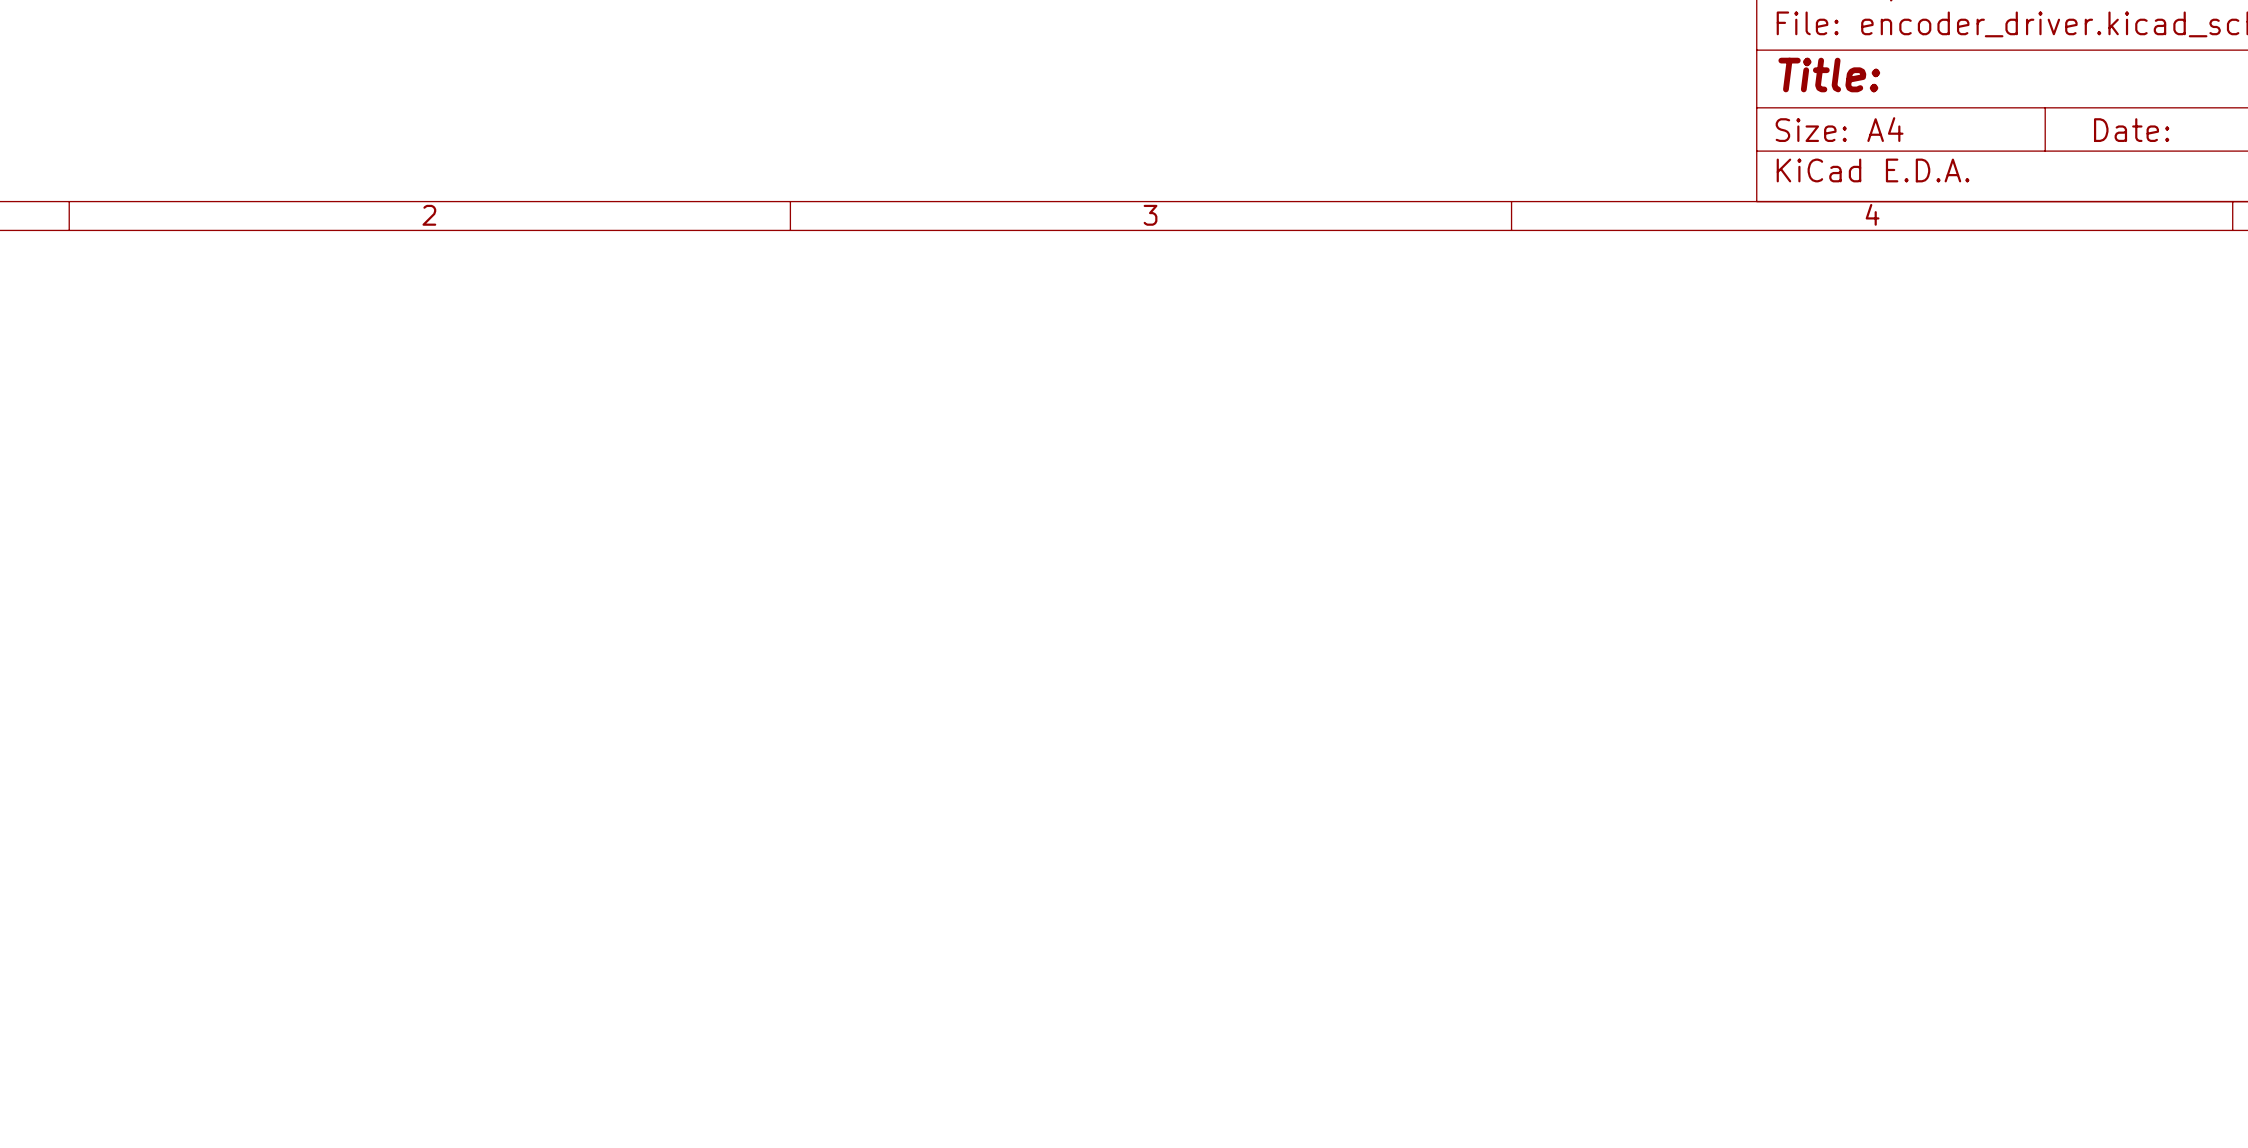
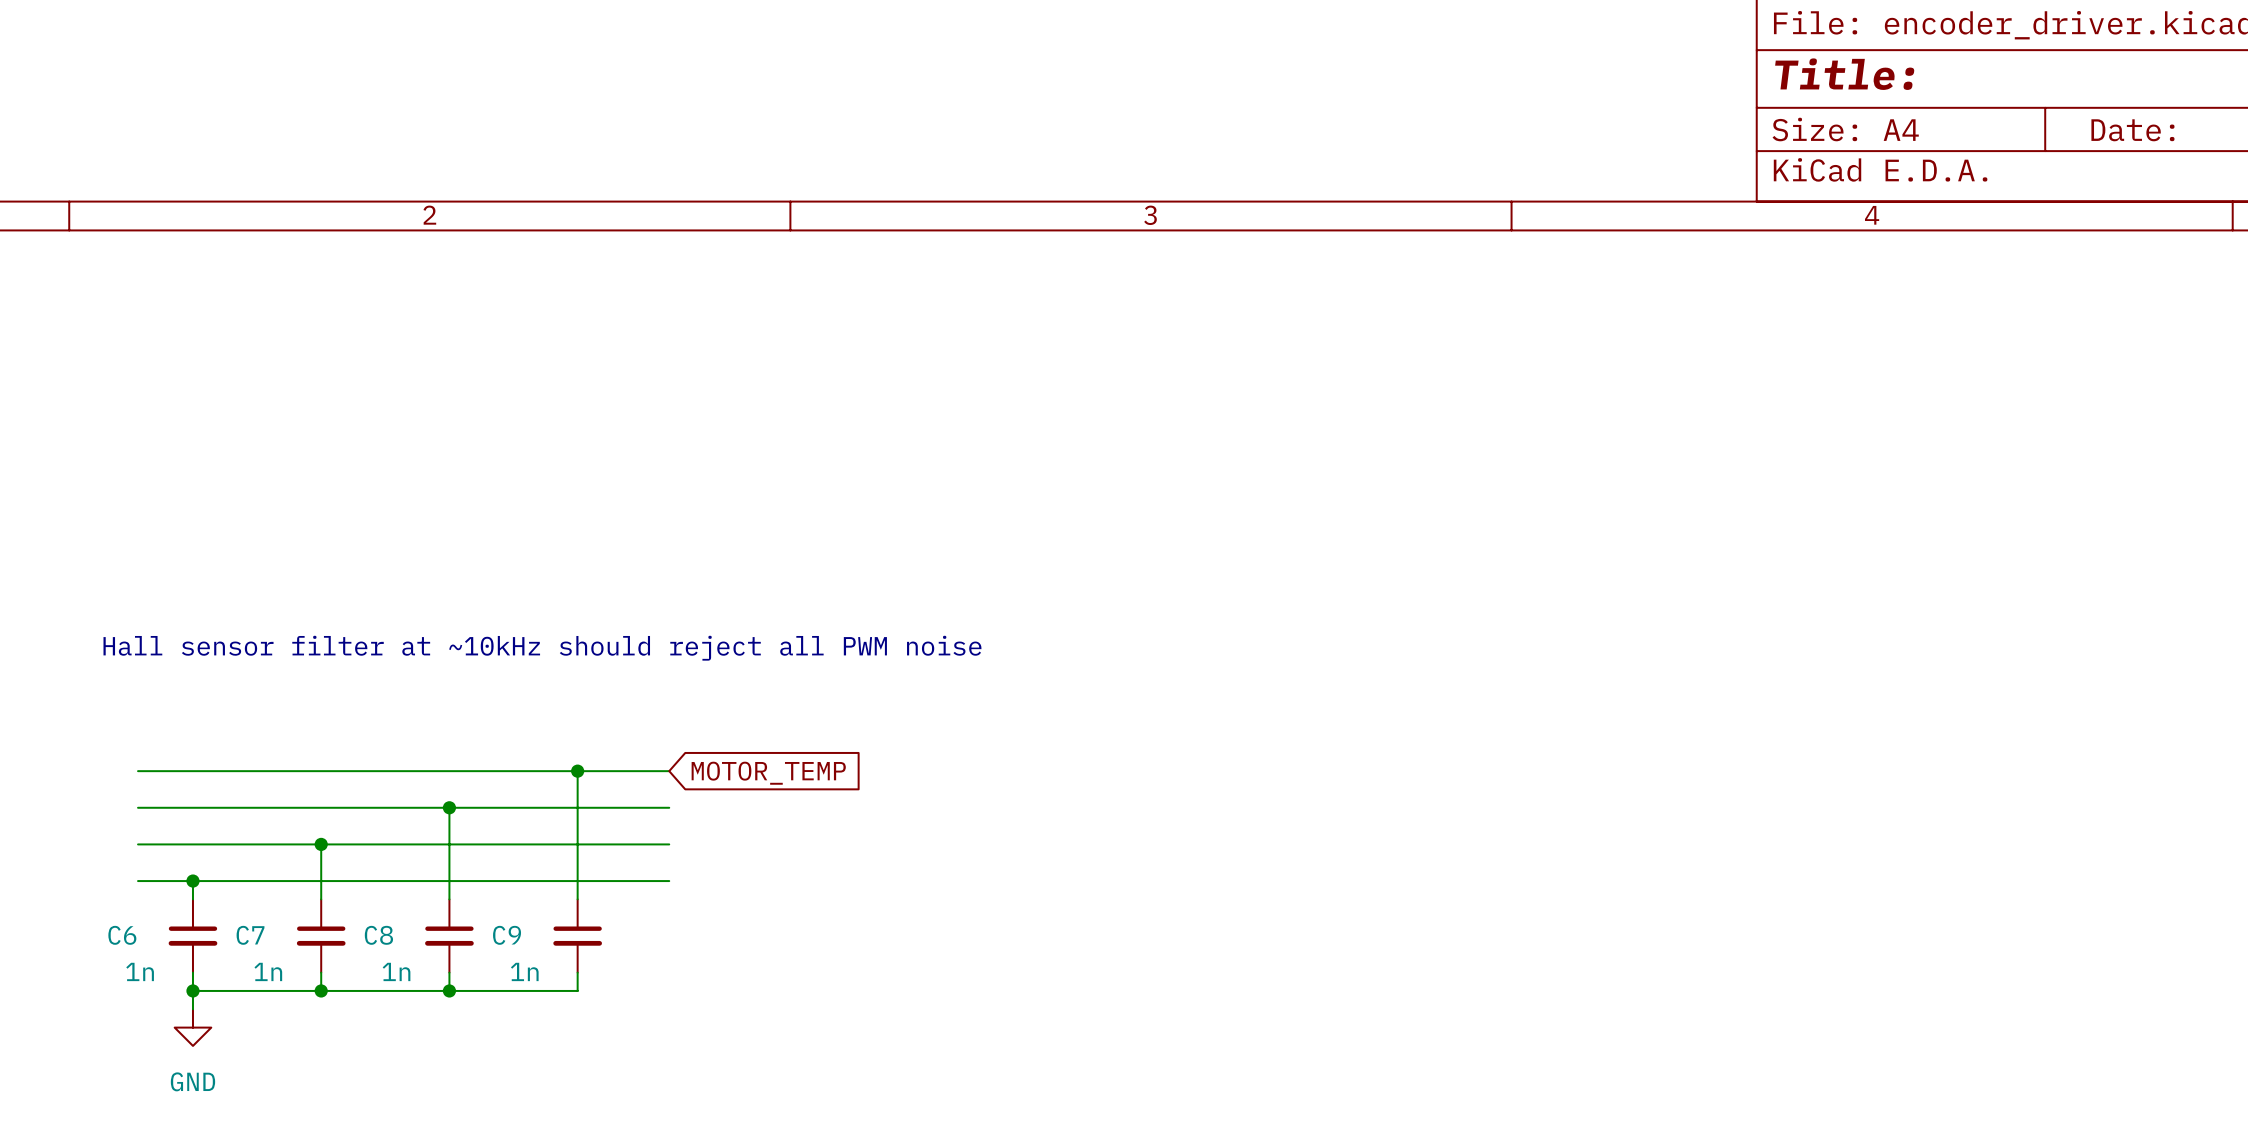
text: none -> Hall sensor filter at ~10kHz should reject all PWM noise (542, 648)
wire: none -> (138, 771) (669, 771)
wire: none -> (577, 771) (577, 899)
junction: none -> (577, 771)
global label: none -> MOTOR_TEMP (768, 773)
wire: none -> (138, 807) (669, 807)
wire: none -> (449, 807) (449, 899)
junction: none -> (449, 807)
wire: none -> (138, 844) (669, 844)
wire: none -> (321, 844) (321, 899)
junction: none -> (321, 844)
wire: none -> (138, 881) (669, 881)
wire: none -> (192, 881) (192, 899)
junction: none -> (192, 881)
C6: none -> 1n (192, 936)
C7: none -> 1n (321, 936)
C8: none -> 1n (449, 936)
C9: none -> 1n (577, 936)
wire: none -> (192, 972) (192, 1009)
wire: none -> (321, 972) (321, 990)
wire: none -> (449, 972) (449, 990)
wire: none -> (577, 972) (577, 990) (192, 990)
junction: none -> (192, 990)
junction: none -> (321, 990)
junction: none -> (449, 990)
power symbol: none -> GND (192, 1027)

